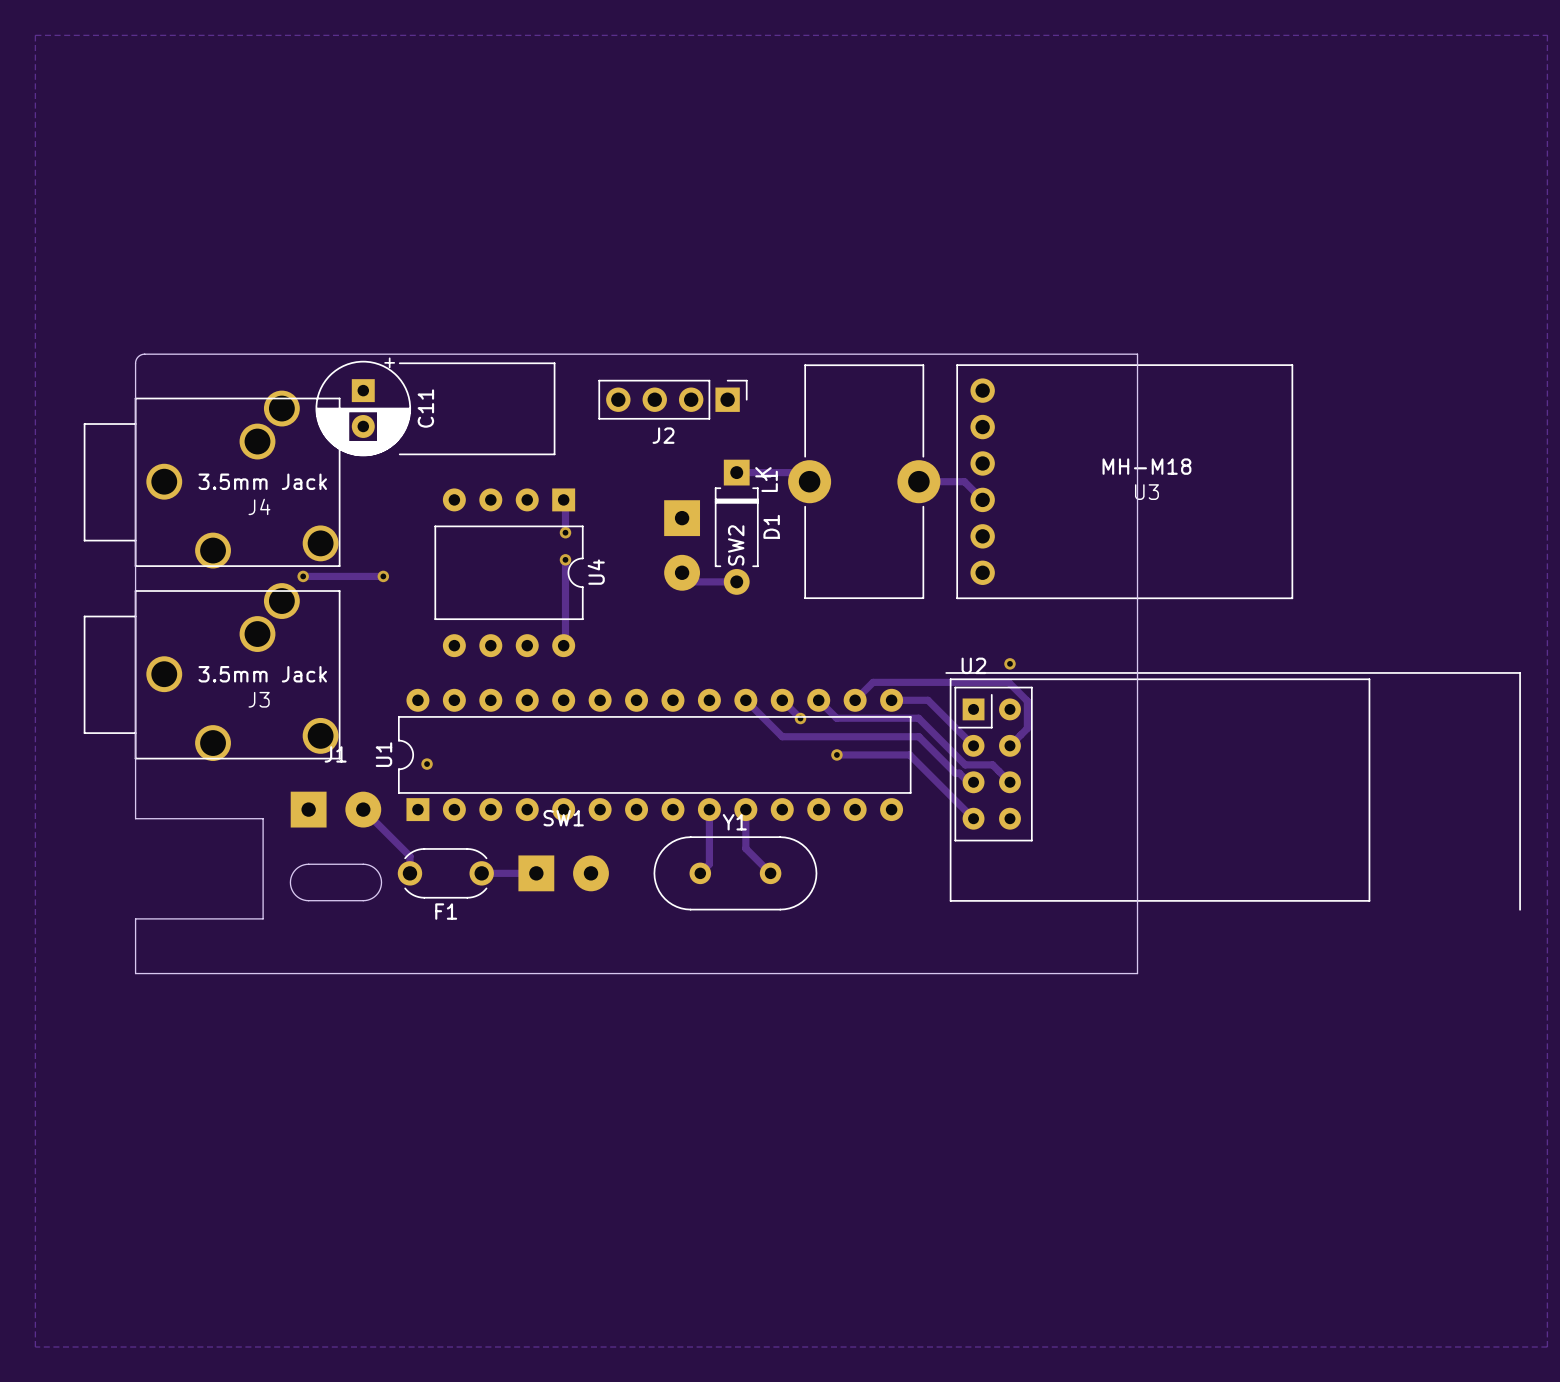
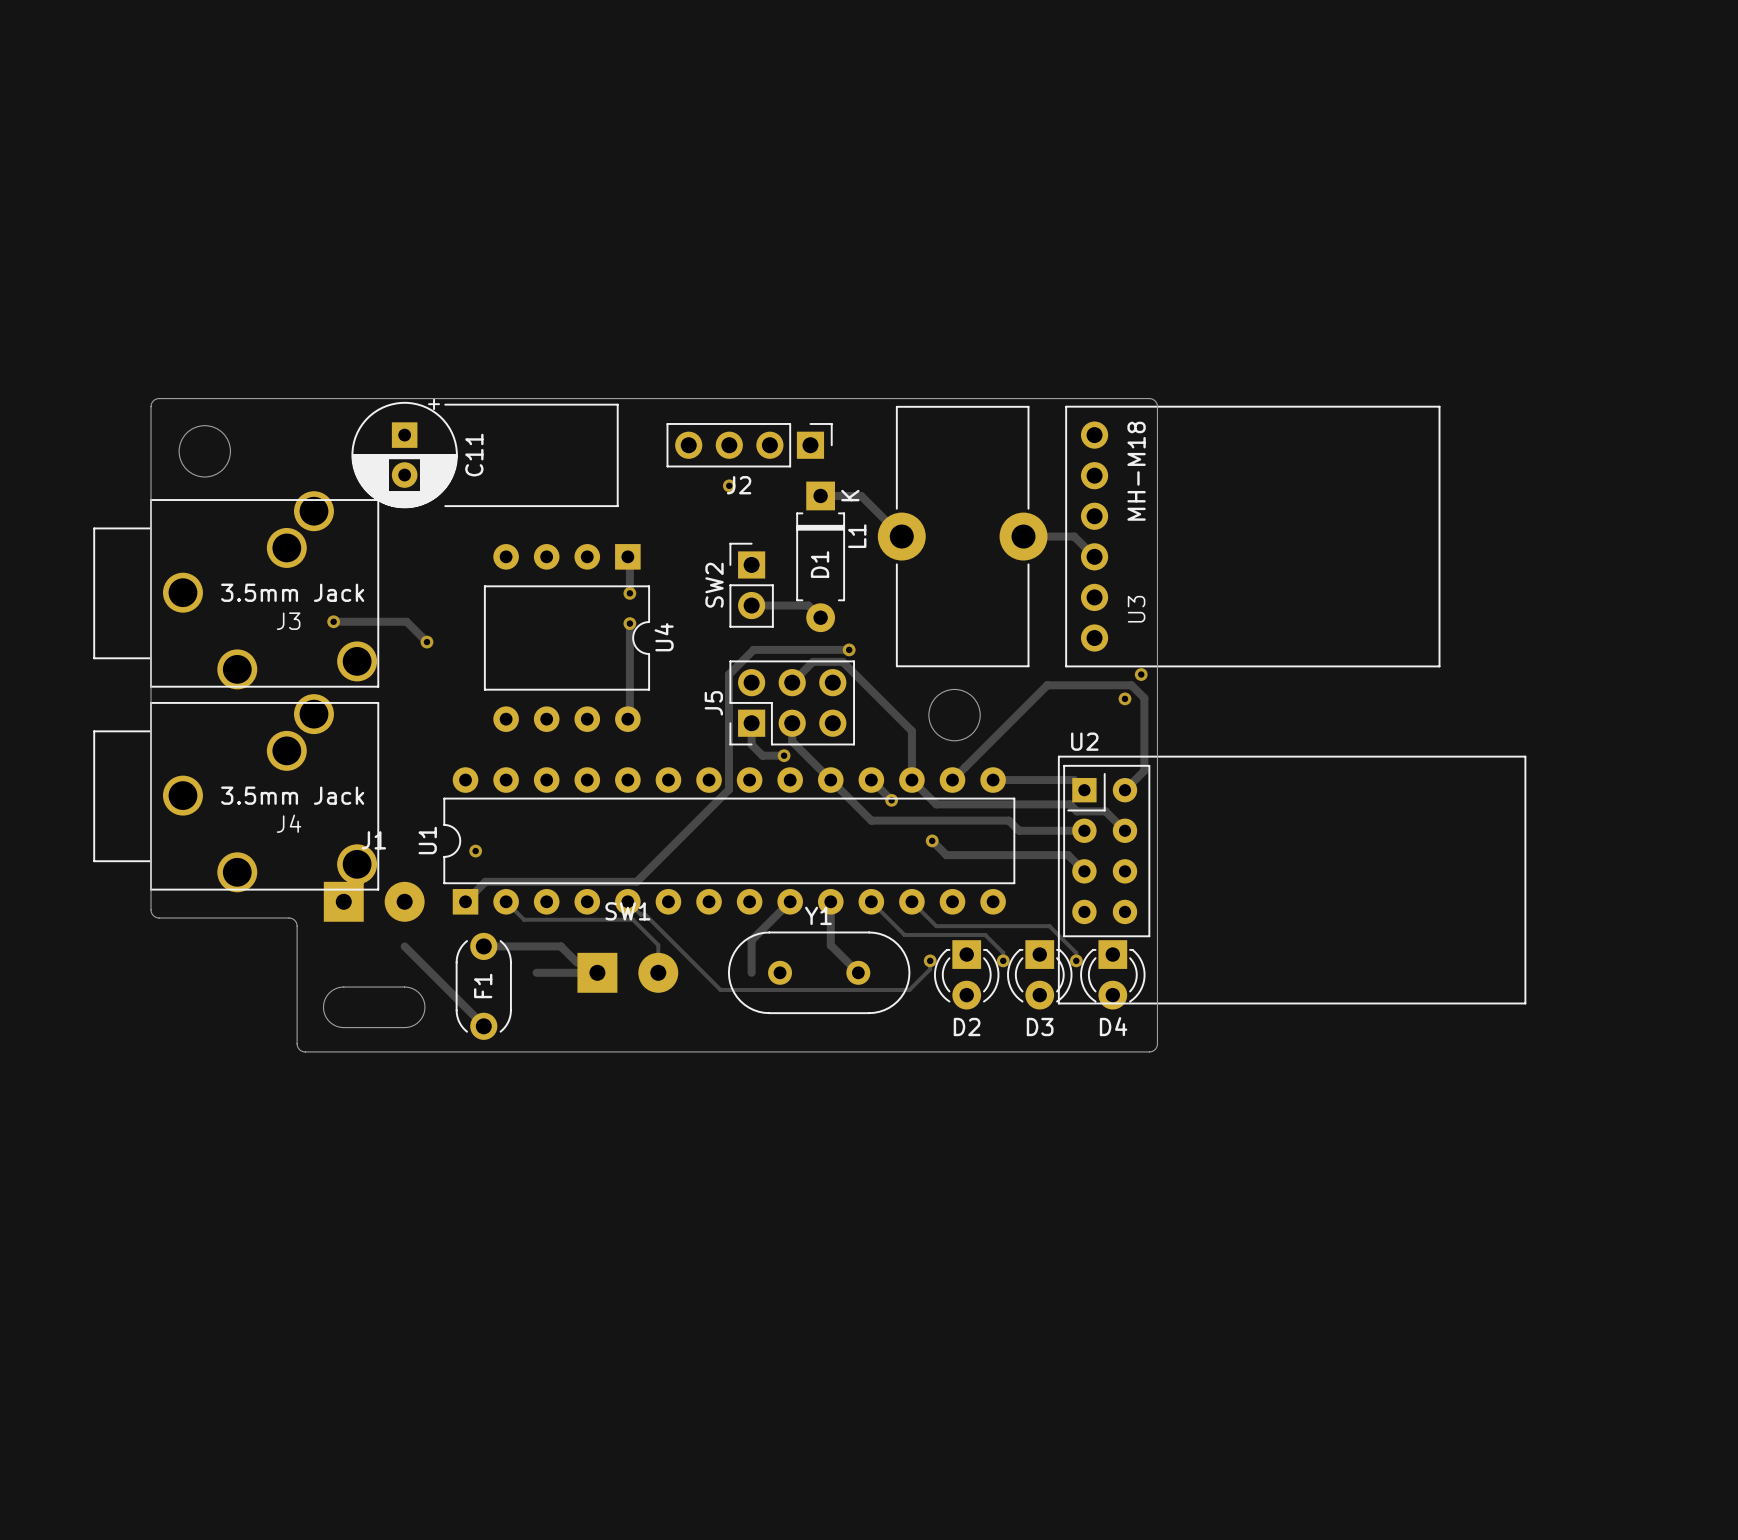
zone outline: (35, 35) (35, 1347) (1547, 1347) (1547, 35) (35, 35) -> none
board edge: (135, 365) (137, 357) (144, 354) (1137, 354) (1137, 973) (135, 973) (135, 918) (263, 918) (263, 818) (135, 818) (135, 816) -> (151, 406) (153, 400) (159, 398) (1153, 399) (1157, 406) (1157, 1044) (1154, 1050) (1149, 1051) (304, 1051) (299, 1049) (297, 1044) (297, 926) (294, 920) (288, 918) (158, 917) (152, 914) (151, 909)
round board edge: none -> [178, 425, 231, 478]
via: none -> (729, 485)
U3 text rotation: 0° (1146, 466) -> 90° counterclockwise (1136, 471)
U3 text position: MH-M18 (1146, 466) -> MH-M18 (1136, 471)
track: (736, 472) (800, 472) -> (820, 495) (861, 495) (891, 526)
J4 position: (212, 479) -> (236, 793)
U3 name rotation: 0° (1146, 492) -> 90° counterclockwise (1136, 609)
U3 name position: U3 (1146, 492) -> U3 (1136, 609)
SW2 footprint: [664, 500, 701, 591] -> [729, 542, 774, 628]
D1 name position: D1 (771, 526) -> D1 (820, 564)
D1 position: (736, 527) -> (820, 556)
track: none -> (751, 605) (808, 605) (820, 617)
SW2 name position: SW2 (736, 545) -> SW2 (714, 585)
track: (682, 572) (691, 581) (736, 581) -> none
track: (303, 576) (383, 576) -> (333, 621) (406, 621) (426, 642)
via position: (303, 576) -> (333, 621)
track: none -> (849, 649) (753, 649) (728, 674) (728, 789) (636, 881) (485, 881) (465, 901)
via: none -> (849, 649)
via: none -> (1141, 674)
track: none -> (792, 682) (812, 661) (842, 661) (911, 731) (911, 780)
round board edge: none -> [928, 689, 981, 742]
via: none -> (1124, 698)
J5: none -> (792, 702)
track: none -> (751, 723) (751, 744) (762, 755) (784, 755)
track: none -> (792, 723) (792, 741) (830, 780)
via: (1009, 663) -> none
J3 position: (212, 672) -> (236, 590)
line: (946, 672) (1520, 672) (1520, 909) -> none
via: none -> (784, 755)
track: (873, 682) (1008, 682) (1027, 701) (1027, 728) (1009, 745) -> (972, 760) (1047, 685) (1131, 685) (1144, 698) (1144, 770) (1124, 790)
track: (928, 700) (973, 745) -> (1033, 780) (1074, 780) (1084, 790)
track: (836, 718) (918, 718) (965, 764) (992, 764) (1009, 782) -> (931, 800) (936, 804) (1069, 804) (1076, 811) (1105, 811) (1124, 830)
track: (905, 736) (918, 736) (955, 773) (959, 773) (968, 782) (973, 782) -> (1008, 820) (1019, 830) (1084, 830)
track: (836, 754) (909, 754) (973, 818) -> (932, 840) (946, 855) (1068, 855) (1084, 871)
track: (363, 809) (409, 856) (409, 873) -> none
track: none -> (506, 901) (524, 919) (632, 919) (658, 945) (658, 962)
track: none -> (627, 901) (640, 914) (645, 914) (720, 989) (909, 989) (930, 969) (930, 960)
track: (709, 809) (709, 864) (700, 873) -> (790, 901) (751, 940) (751, 972)
track: none -> (871, 901) (904, 934) (985, 934) (1003, 952) (1003, 960)
track: none -> (911, 901) (936, 926) (1049, 926) (1076, 952) (1076, 960)
track: none -> (404, 946) (483, 1026)
track: none -> (483, 946) (560, 946) (577, 962)
via: none -> (930, 960)
via: none -> (1003, 960)
via: none -> (1076, 960)
board edge: (308, 864) (368, 864) (379, 873) (380, 887) (374, 896) (365, 900) (303, 900) (292, 891) (290, 880) (297, 868) (308, 864) -> (343, 987) (409, 987) (417, 991) (422, 997) (424, 1004) (424, 1012) (417, 1023) (407, 1027) (338, 1026) (331, 1023) (326, 1017) (323, 1004) (326, 997) (331, 991) (343, 987)
F1 rotation: 0° (445, 873) -> 90° clockwise (483, 986)
D2: none -> (966, 974)
D3: none -> (1039, 974)
D4: none -> (1112, 974)
F1 name position: F1 (446, 911) -> F1 (483, 985)

